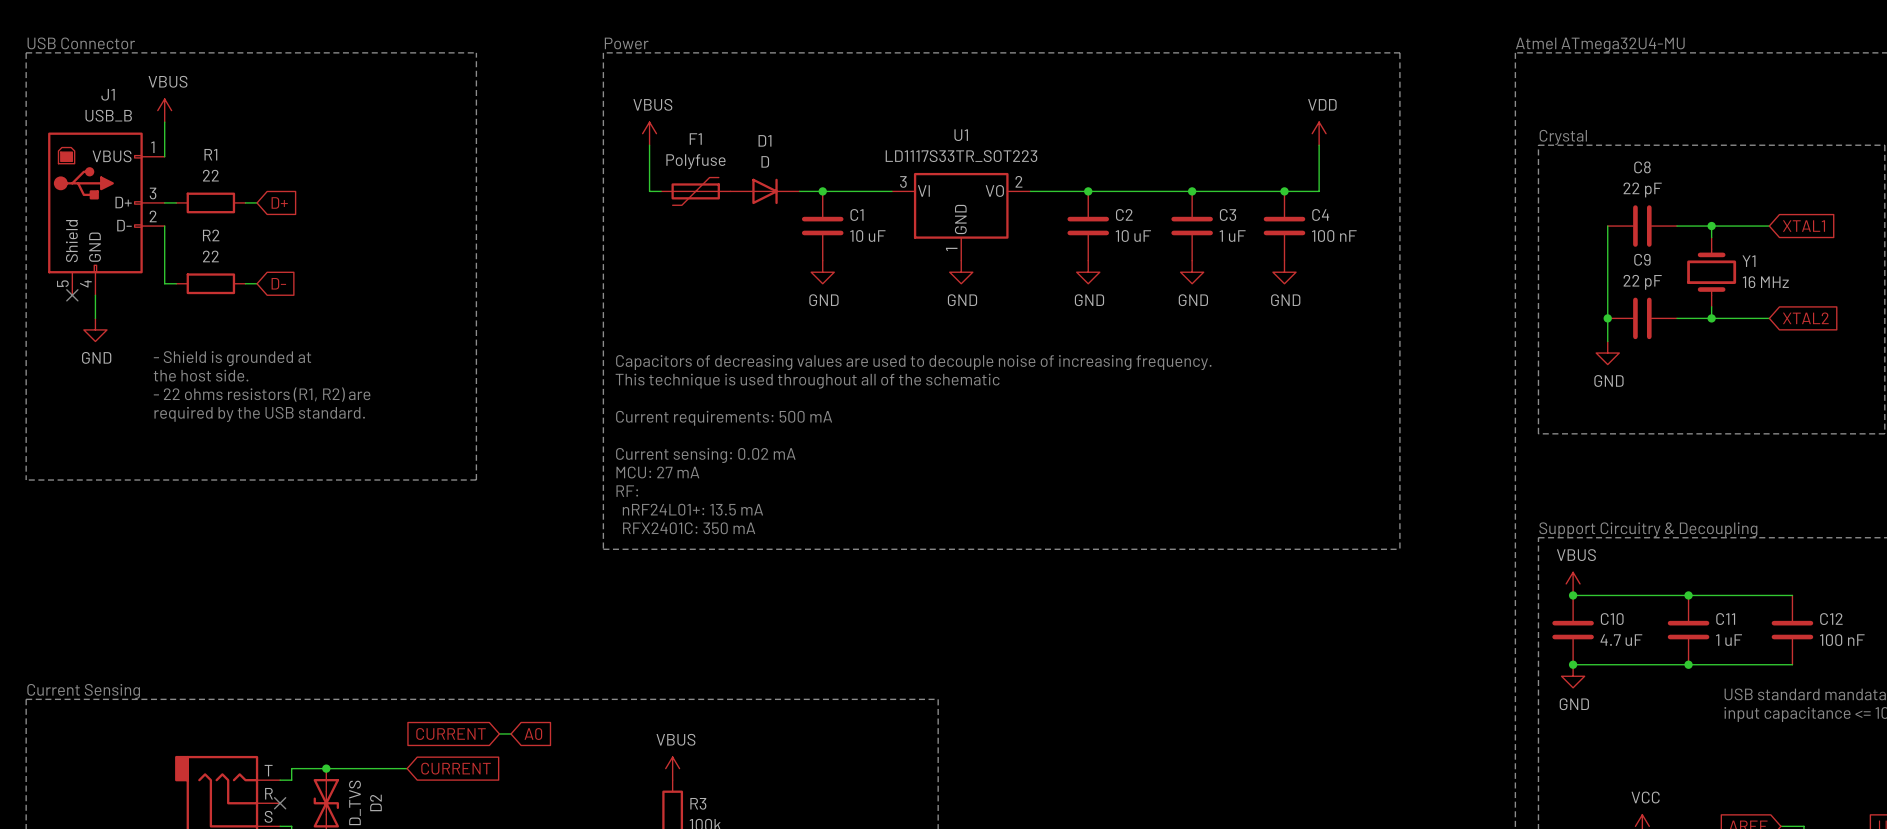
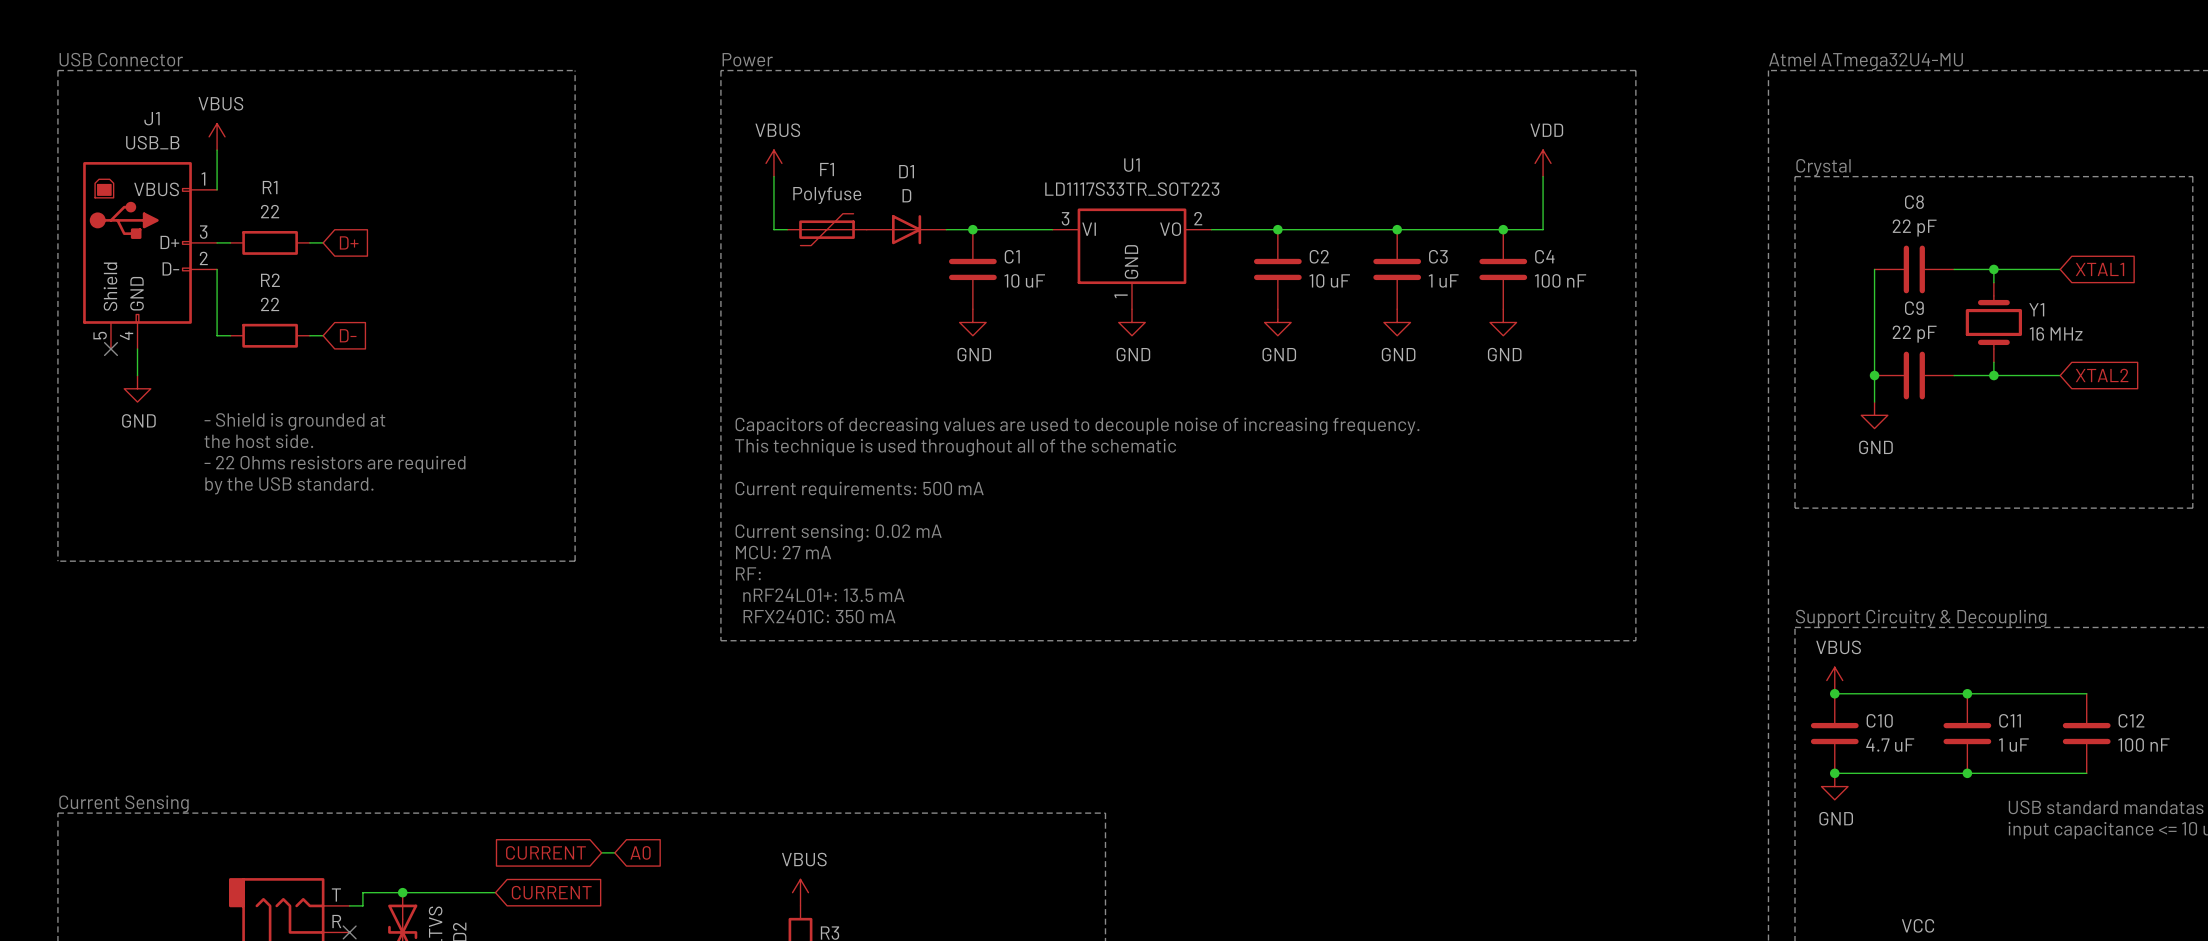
text: - 22 ohms resistors (R1, R2) are (262, 394) -> - 22 Ohms resistors are required (335, 464)
text: required by the USB standard. (259, 414) -> by the USB standard. (289, 485)

